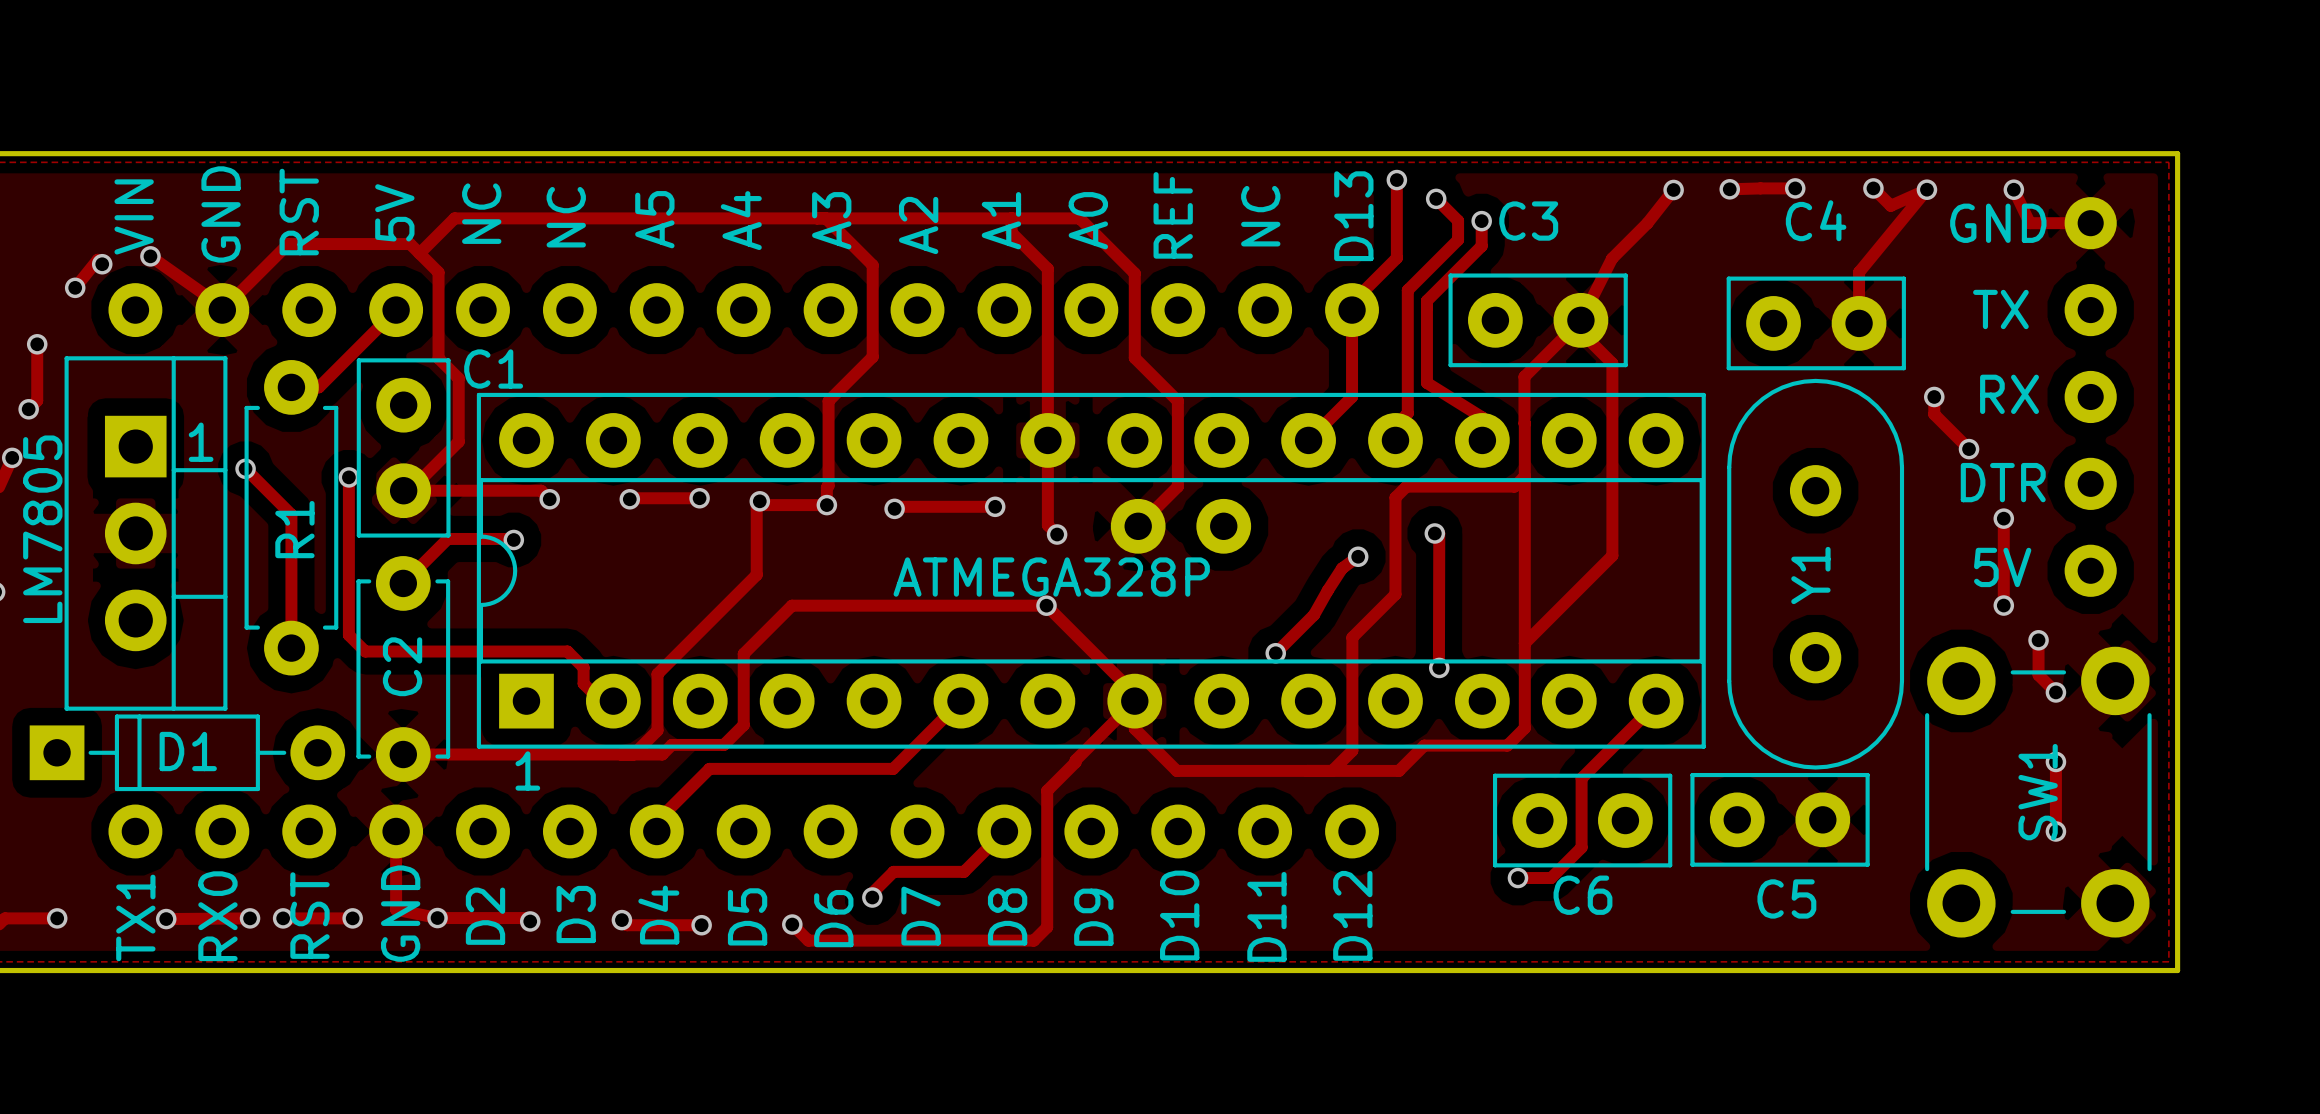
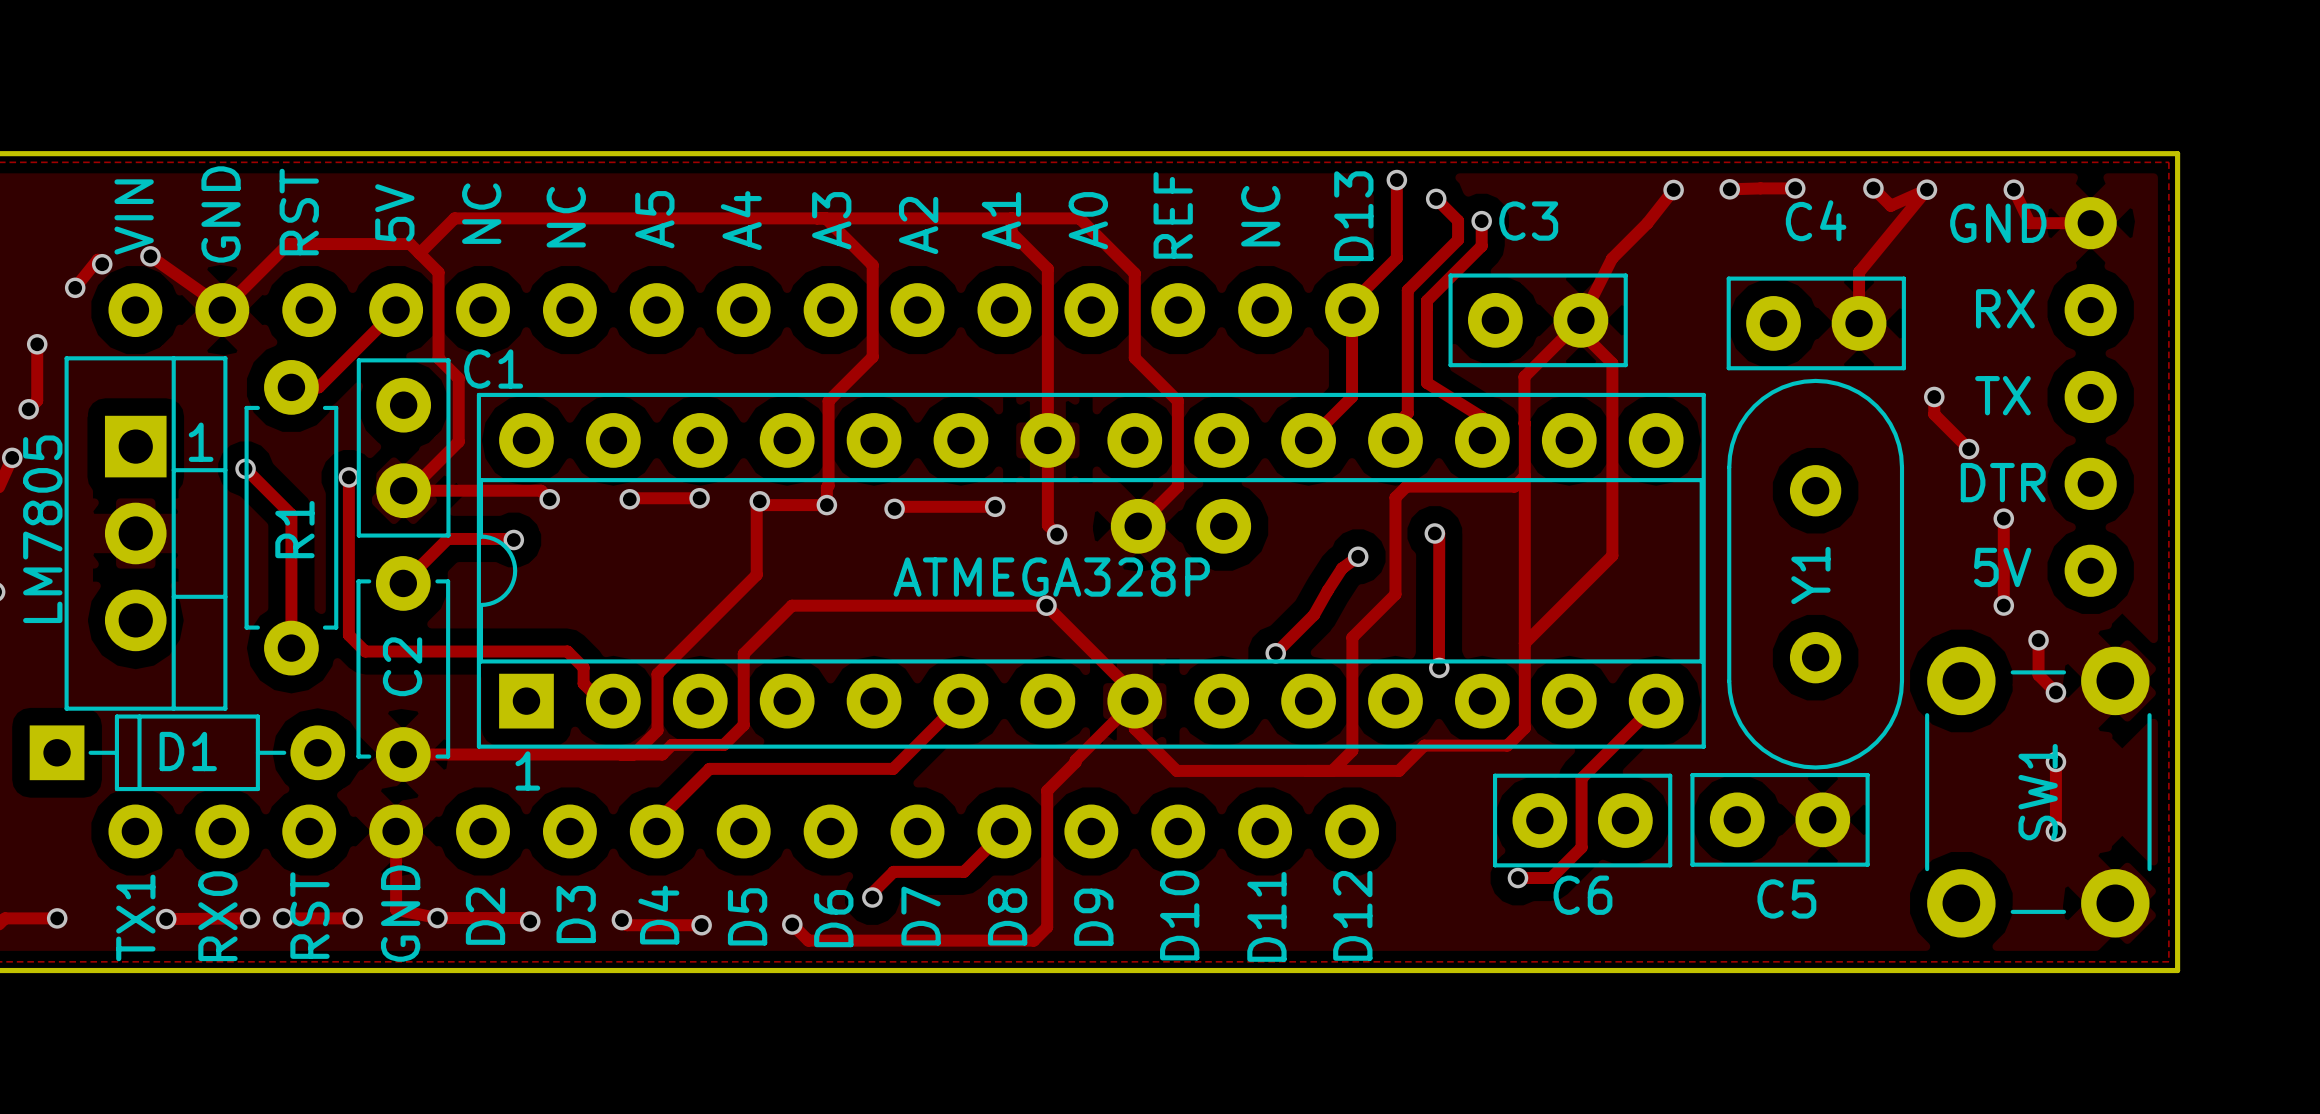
text: TX (2000, 309) -> RX (2005, 308)
text: RX (2009, 394) -> TX (2002, 395)

